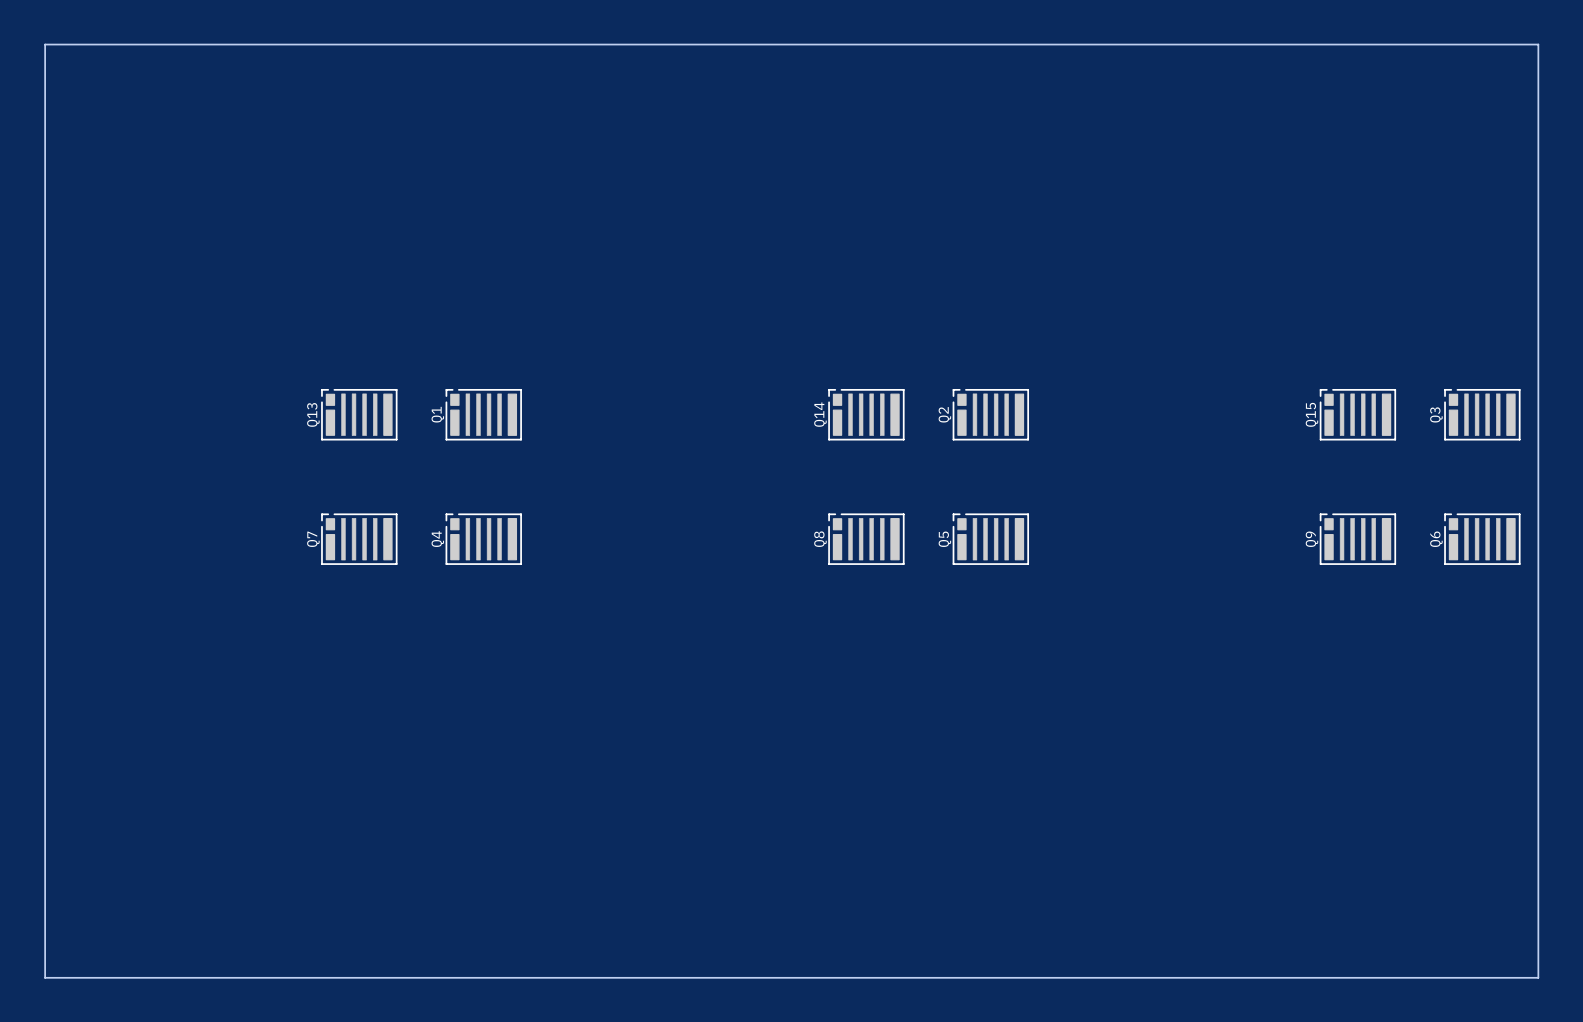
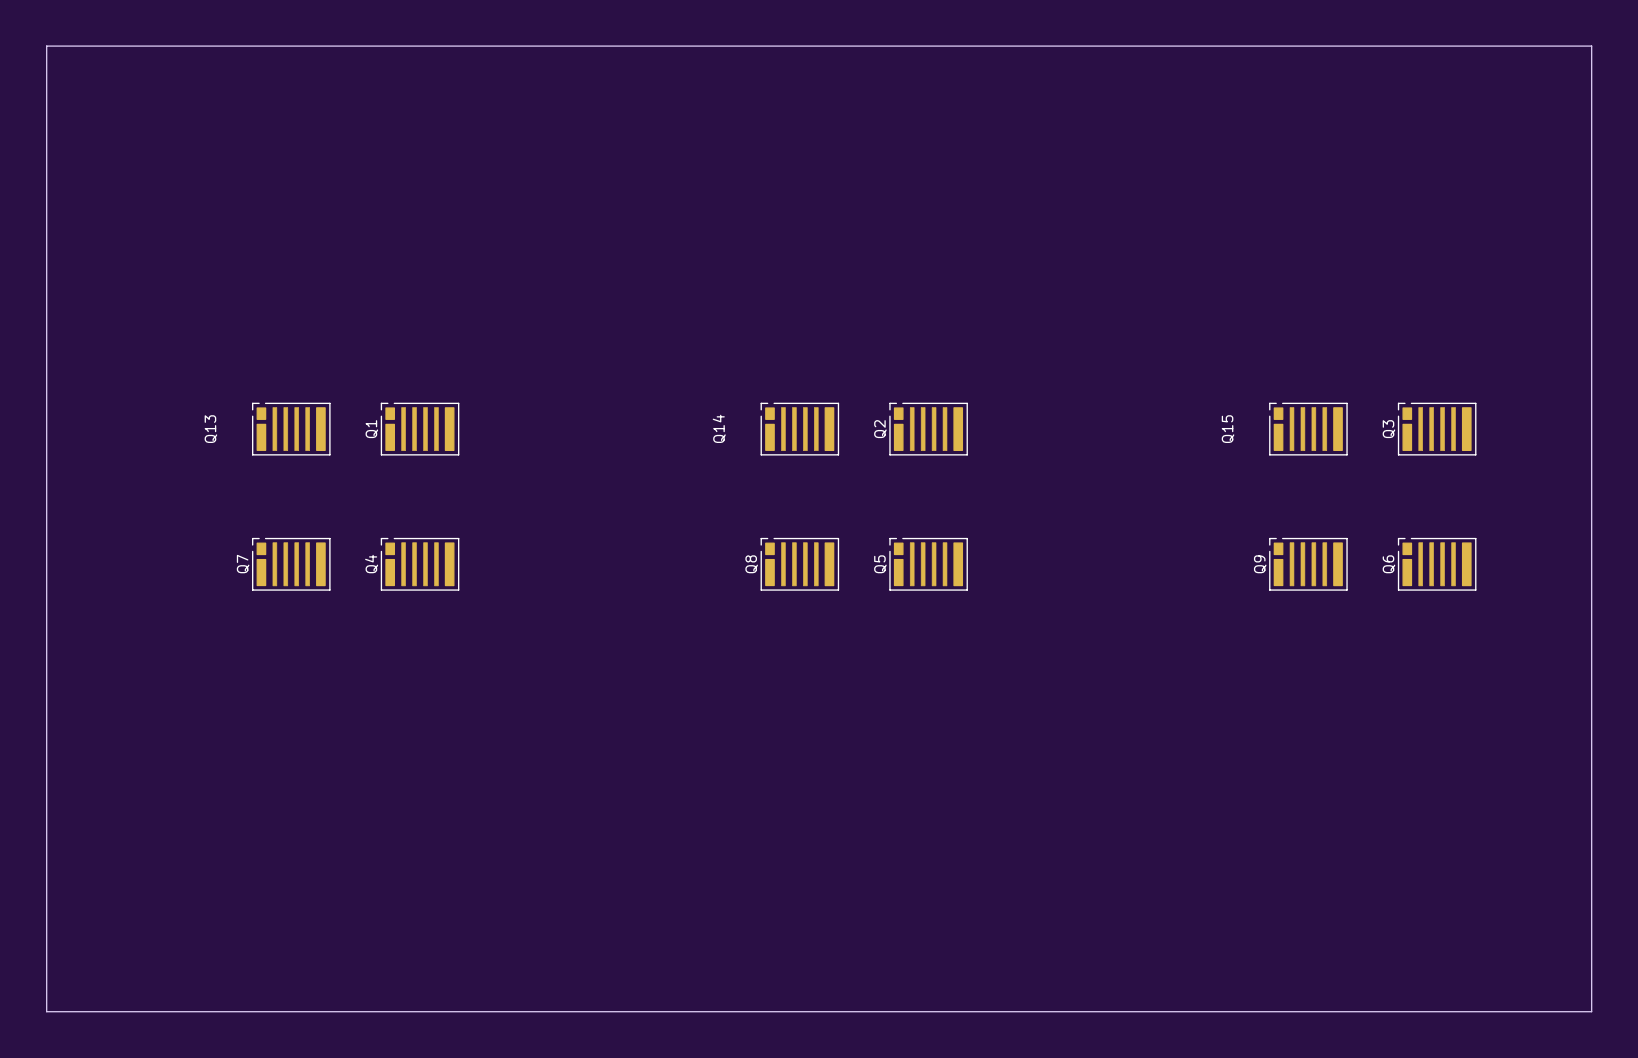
Q13 name position: Q13 (313, 414) -> Q13 (210, 429)
Q13 position: (359, 414) -> (291, 429)
Q1 position: (483, 414) -> (420, 429)
Q14 name position: Q14 (820, 414) -> Q14 (719, 428)
Q14 position: (866, 414) -> (799, 429)
Q2 position: (990, 414) -> (928, 429)
Q15 name position: Q15 (1311, 414) -> Q15 (1228, 429)
Q15 position: (1357, 414) -> (1308, 429)
Q3 position: (1482, 414) -> (1437, 429)
Q7 position: (359, 539) -> (291, 564)
Q4 position: (483, 539) -> (420, 564)
Q8 position: (866, 539) -> (799, 564)
Q5 position: (990, 539) -> (928, 564)
Q9 position: (1357, 539) -> (1308, 564)
Q6 position: (1482, 539) -> (1437, 564)

